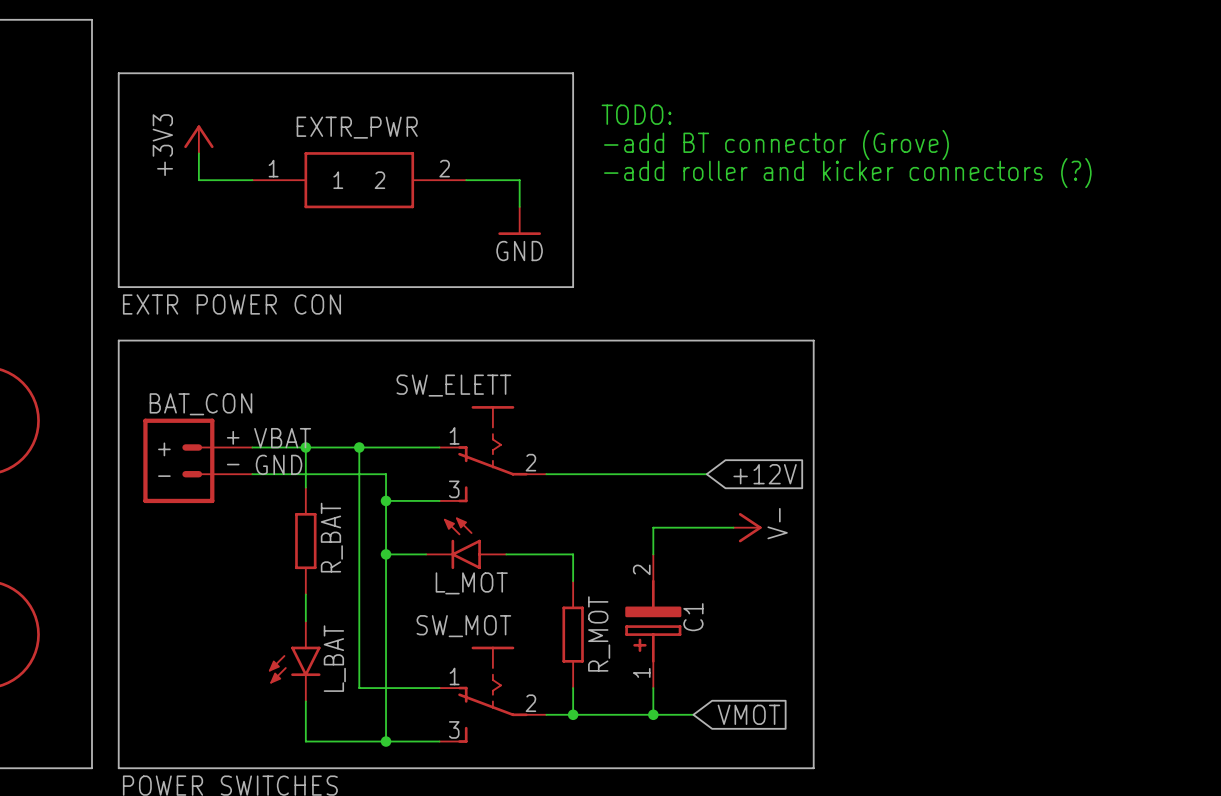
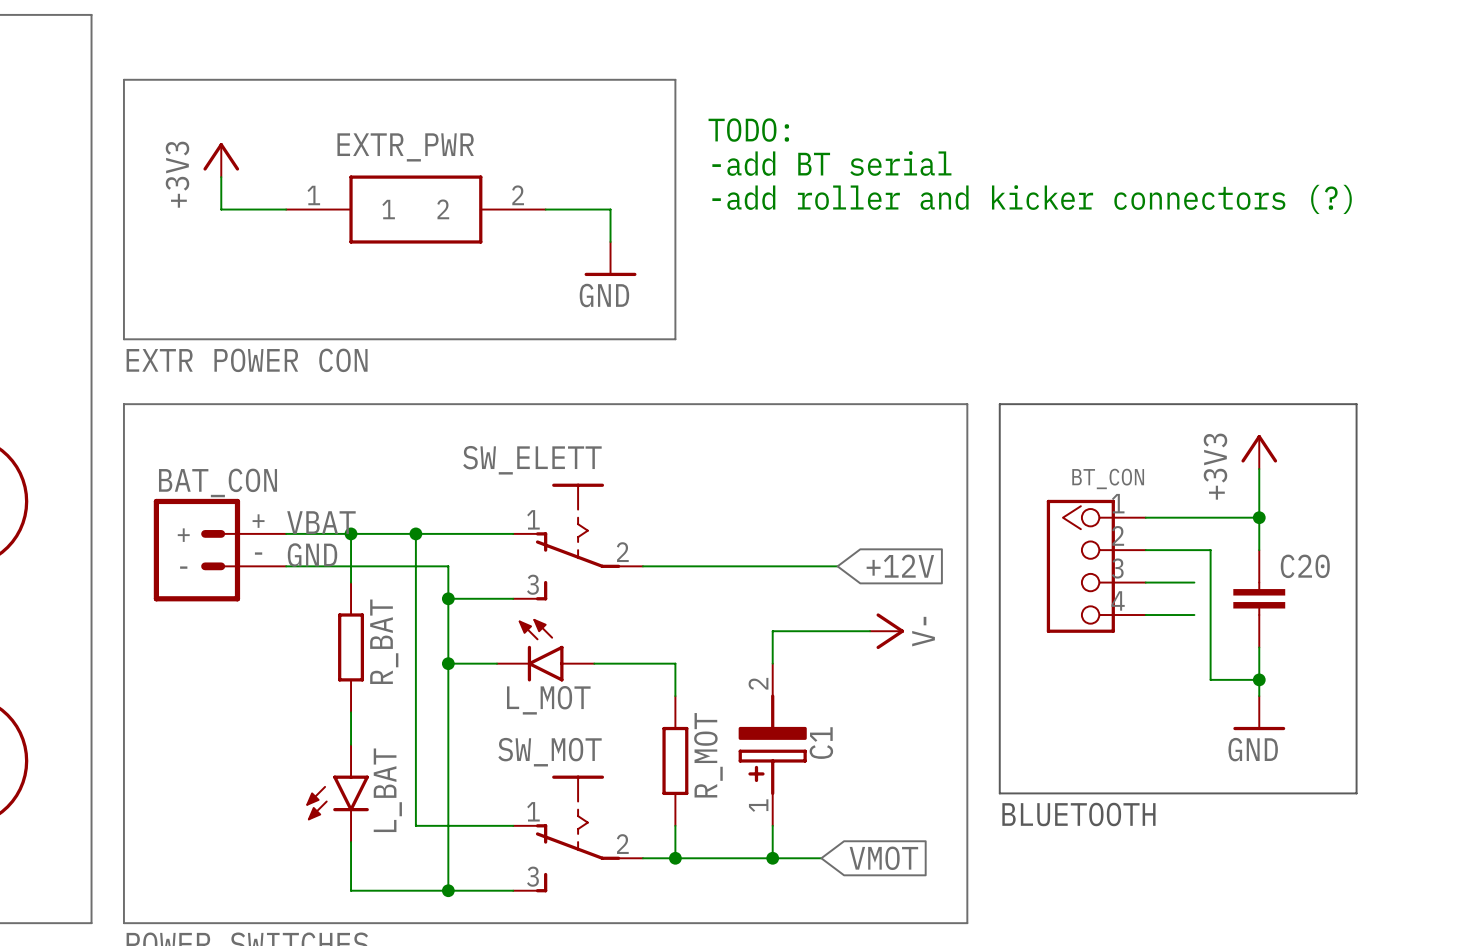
text: -add BT connector (Grove) (776, 144) -> -add BT serial (831, 163)
line: none -> (999, 404) (999, 793) (1356, 793) (1356, 404) (999, 404)
power symbol: none -> +3V3 (1259, 452)
wire: none -> (1259, 469) (1259, 550)
wire: none -> (1145, 517) (1259, 517)
junction: none -> (1259, 517)
wire: none -> (1145, 550) (1210, 550) (1210, 679) (1259, 679)
BT_CON: none -> (1096, 566)
wire: none -> (1145, 582) (1194, 582)
C20: none -> (1259, 598)
wire: none -> (1145, 615) (1194, 615)
wire: none -> (1259, 647) (1259, 696)
junction: none -> (1259, 679)
power symbol: none -> GND (1259, 713)
text: none -> BLUETOOTH (1078, 814)

